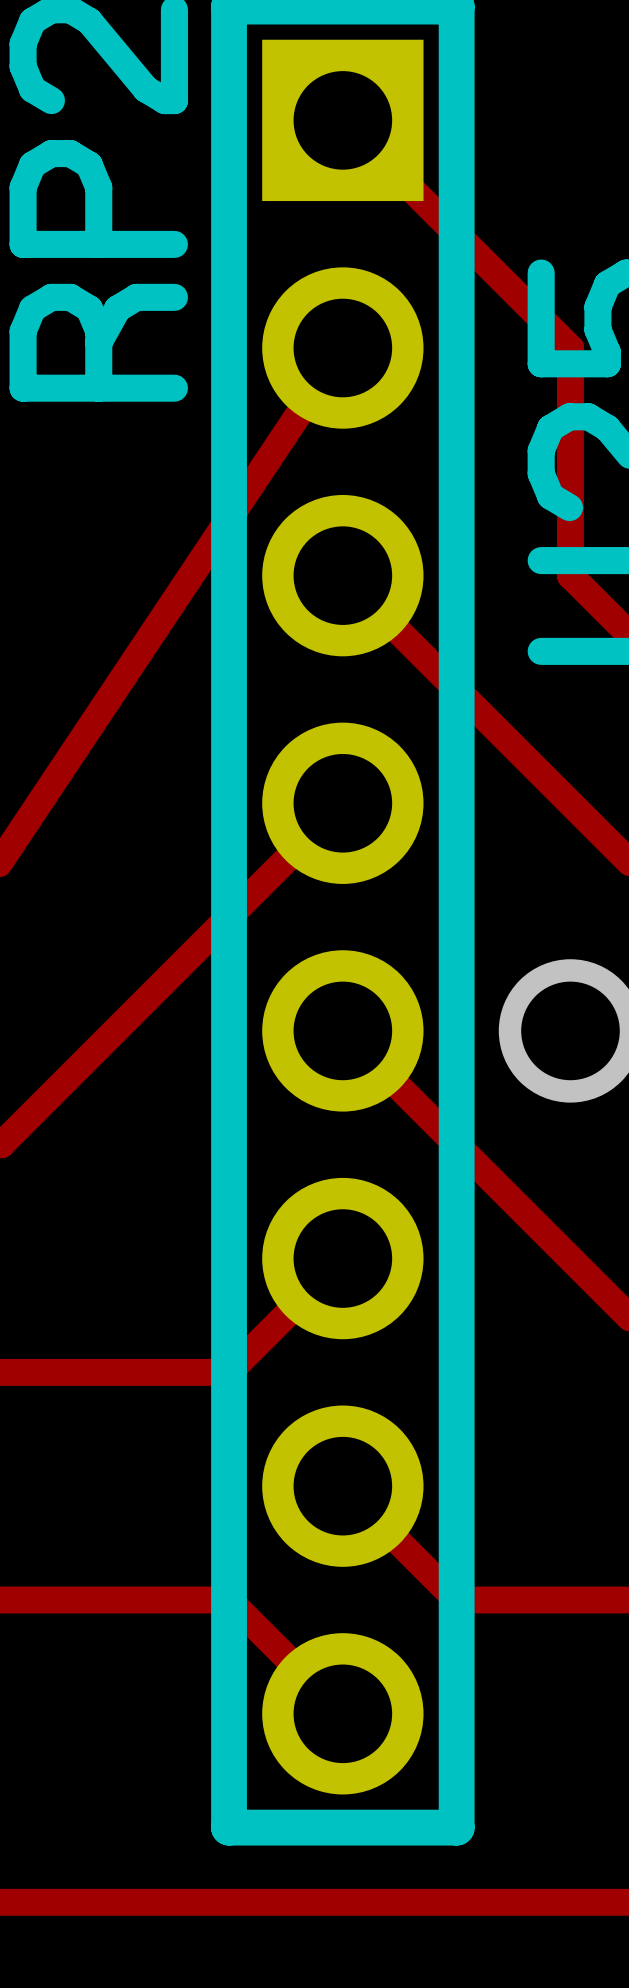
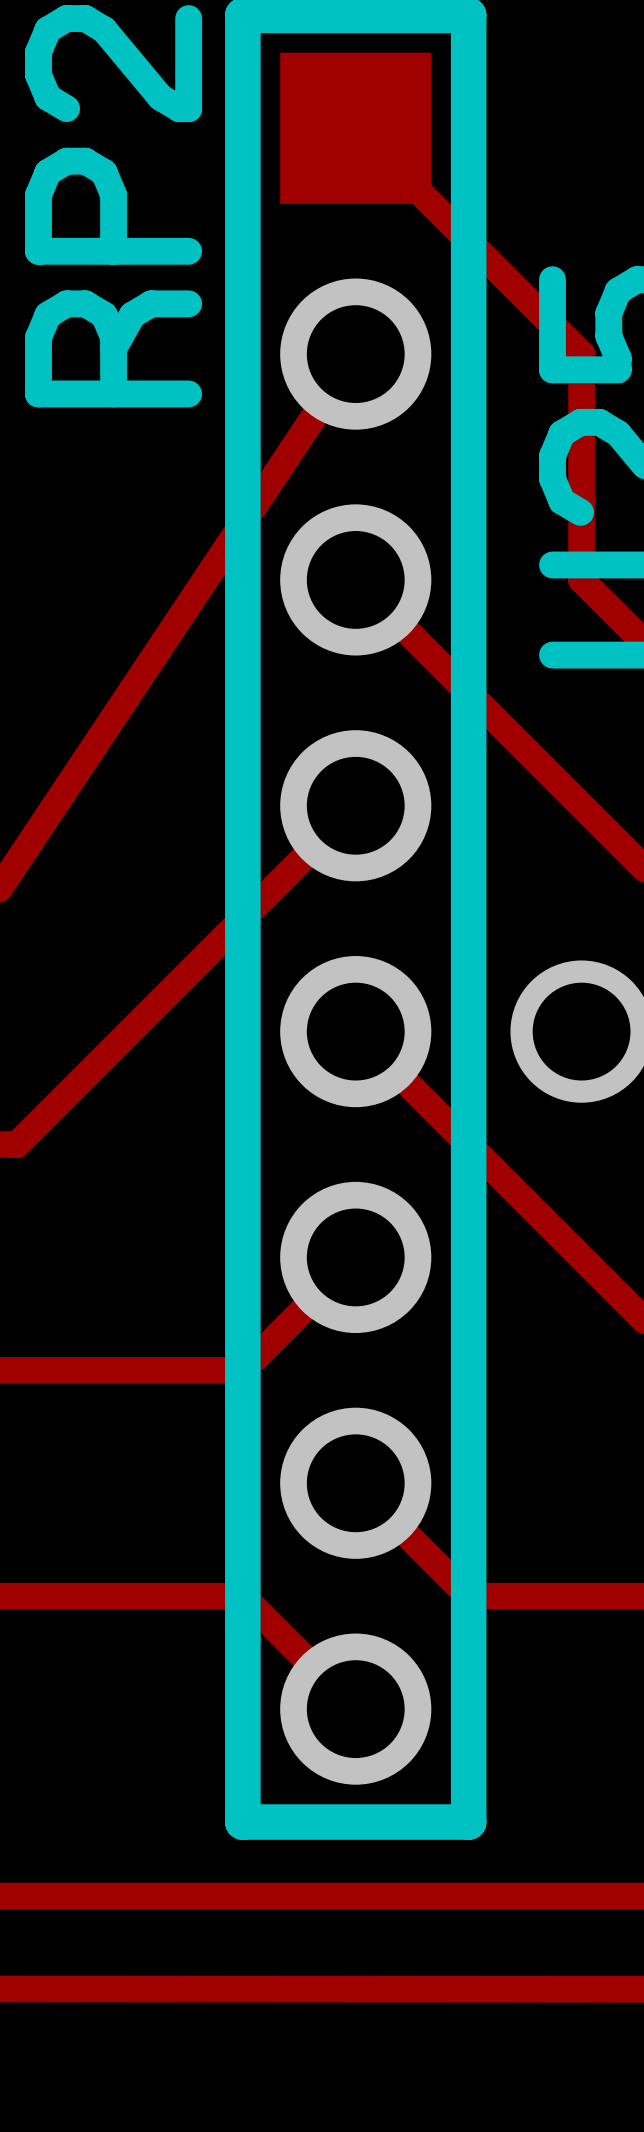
drawing: none -> [280, 52, 432, 204]
via: none -> (355, 354)
via: none -> (355, 579)
via: none -> (355, 805)
part: (342, 917) -> none
via: none -> (355, 1031)
via: none -> (355, 1257)
via: none -> (355, 1483)
via: none -> (355, 1709)

